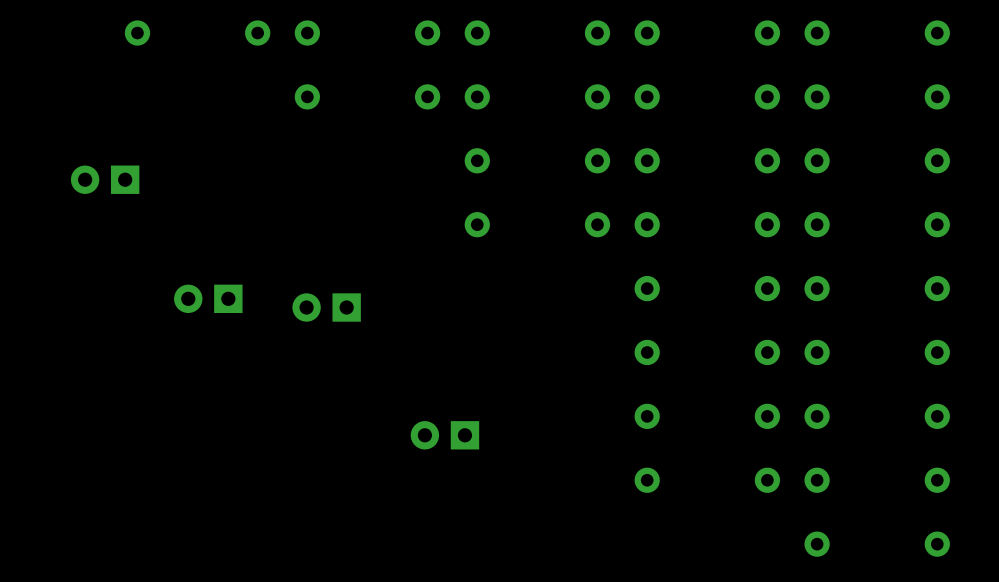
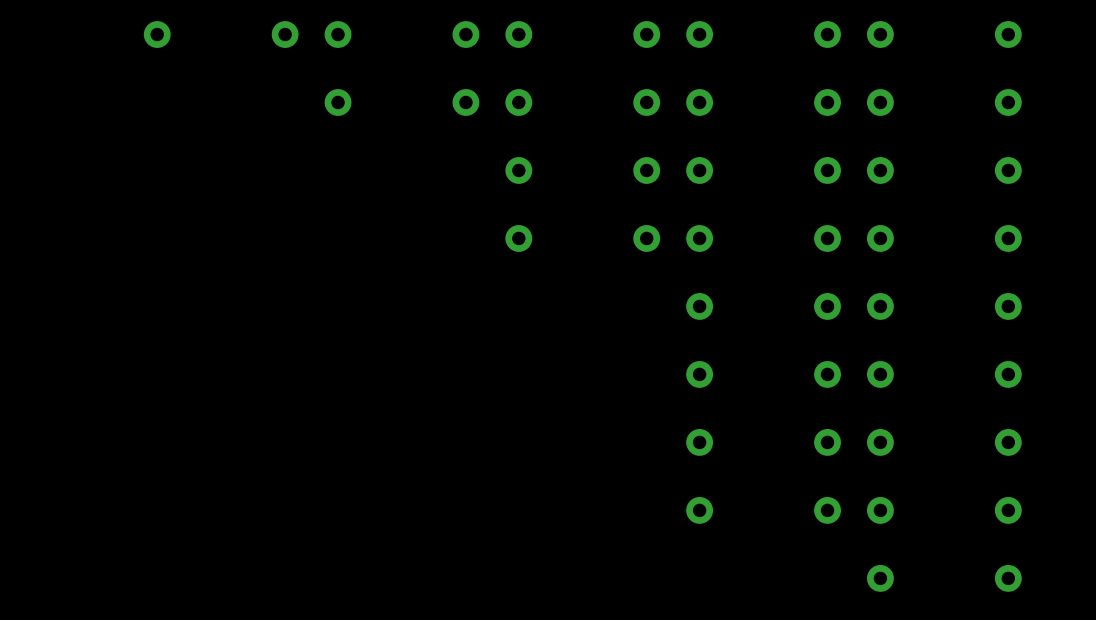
part: (105, 179) -> none
part: (208, 298) -> none
part: (326, 307) -> none
part: (444, 435) -> none

